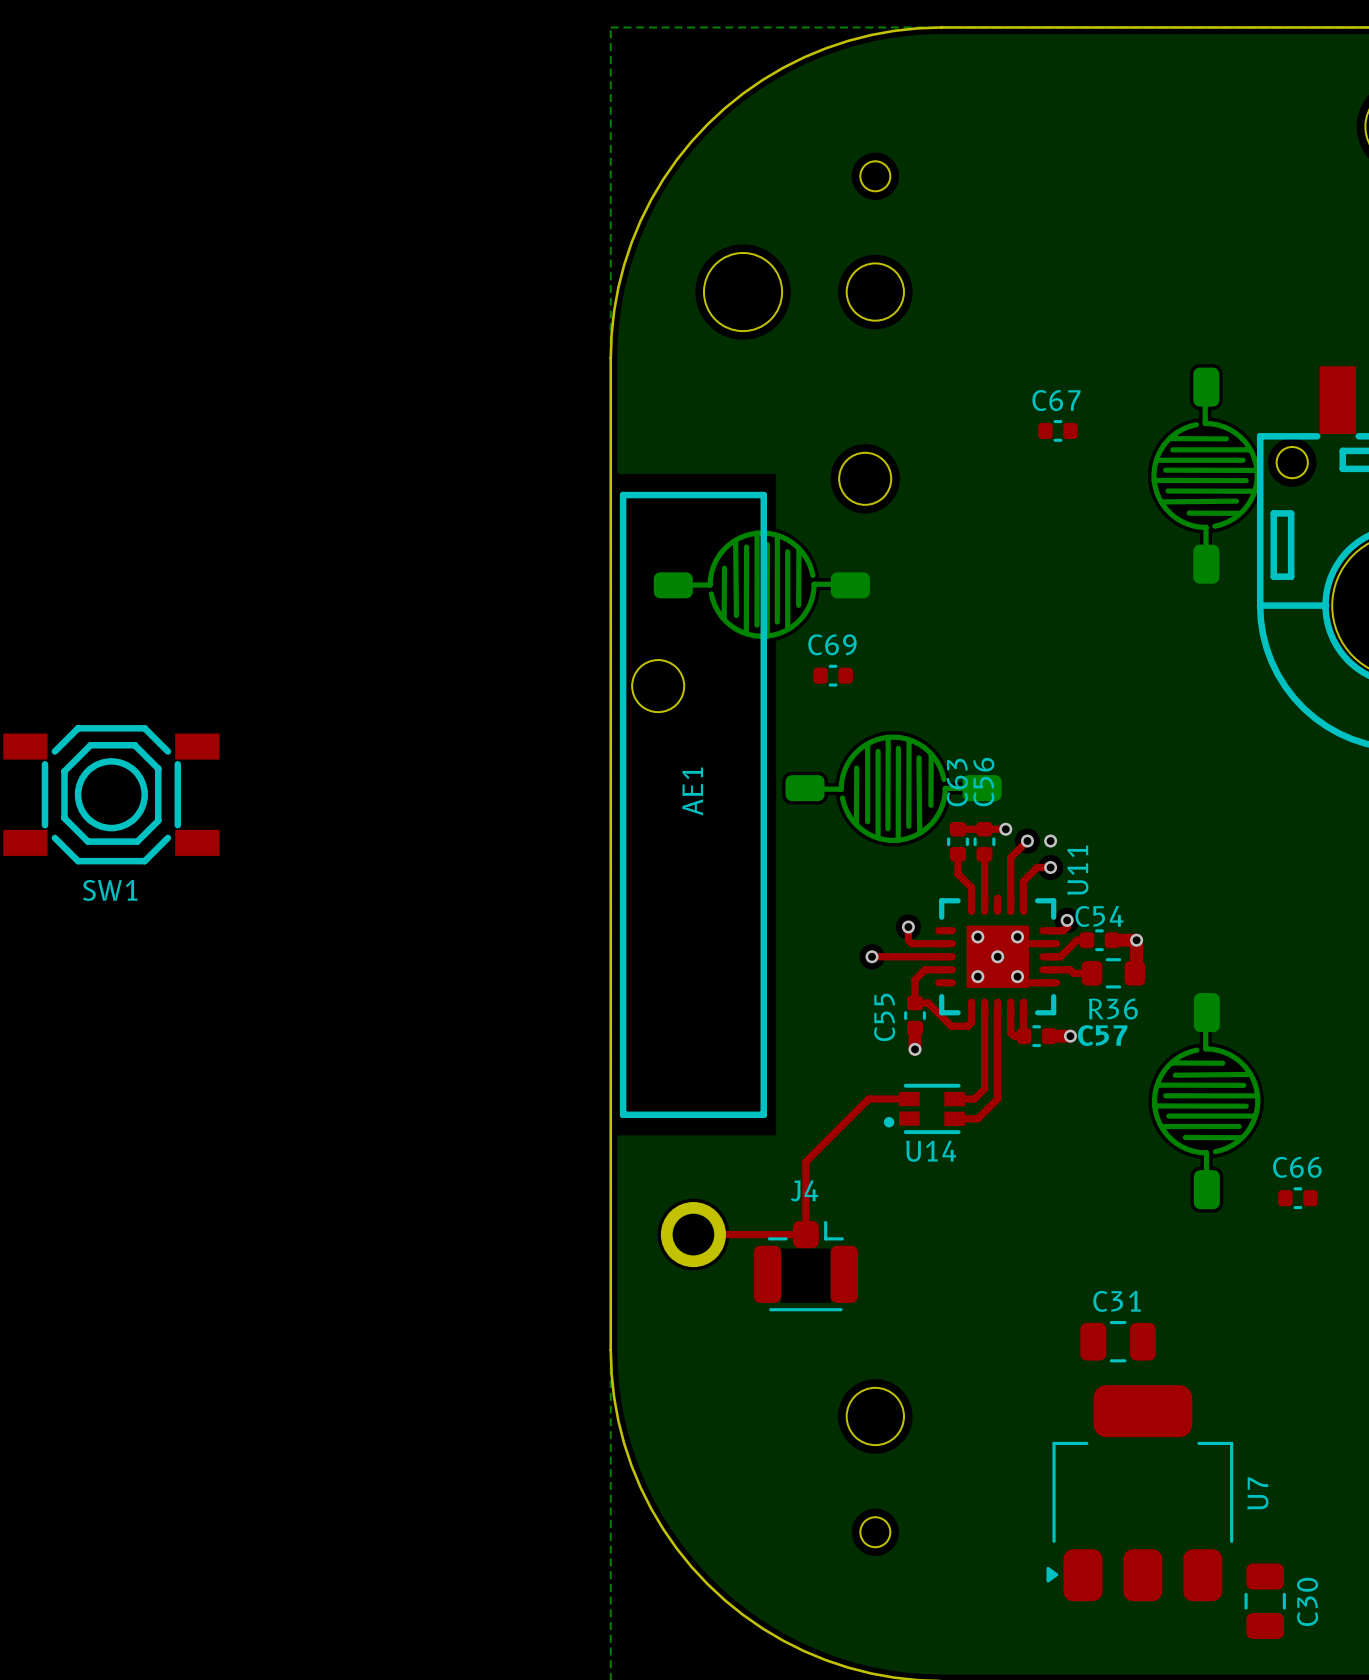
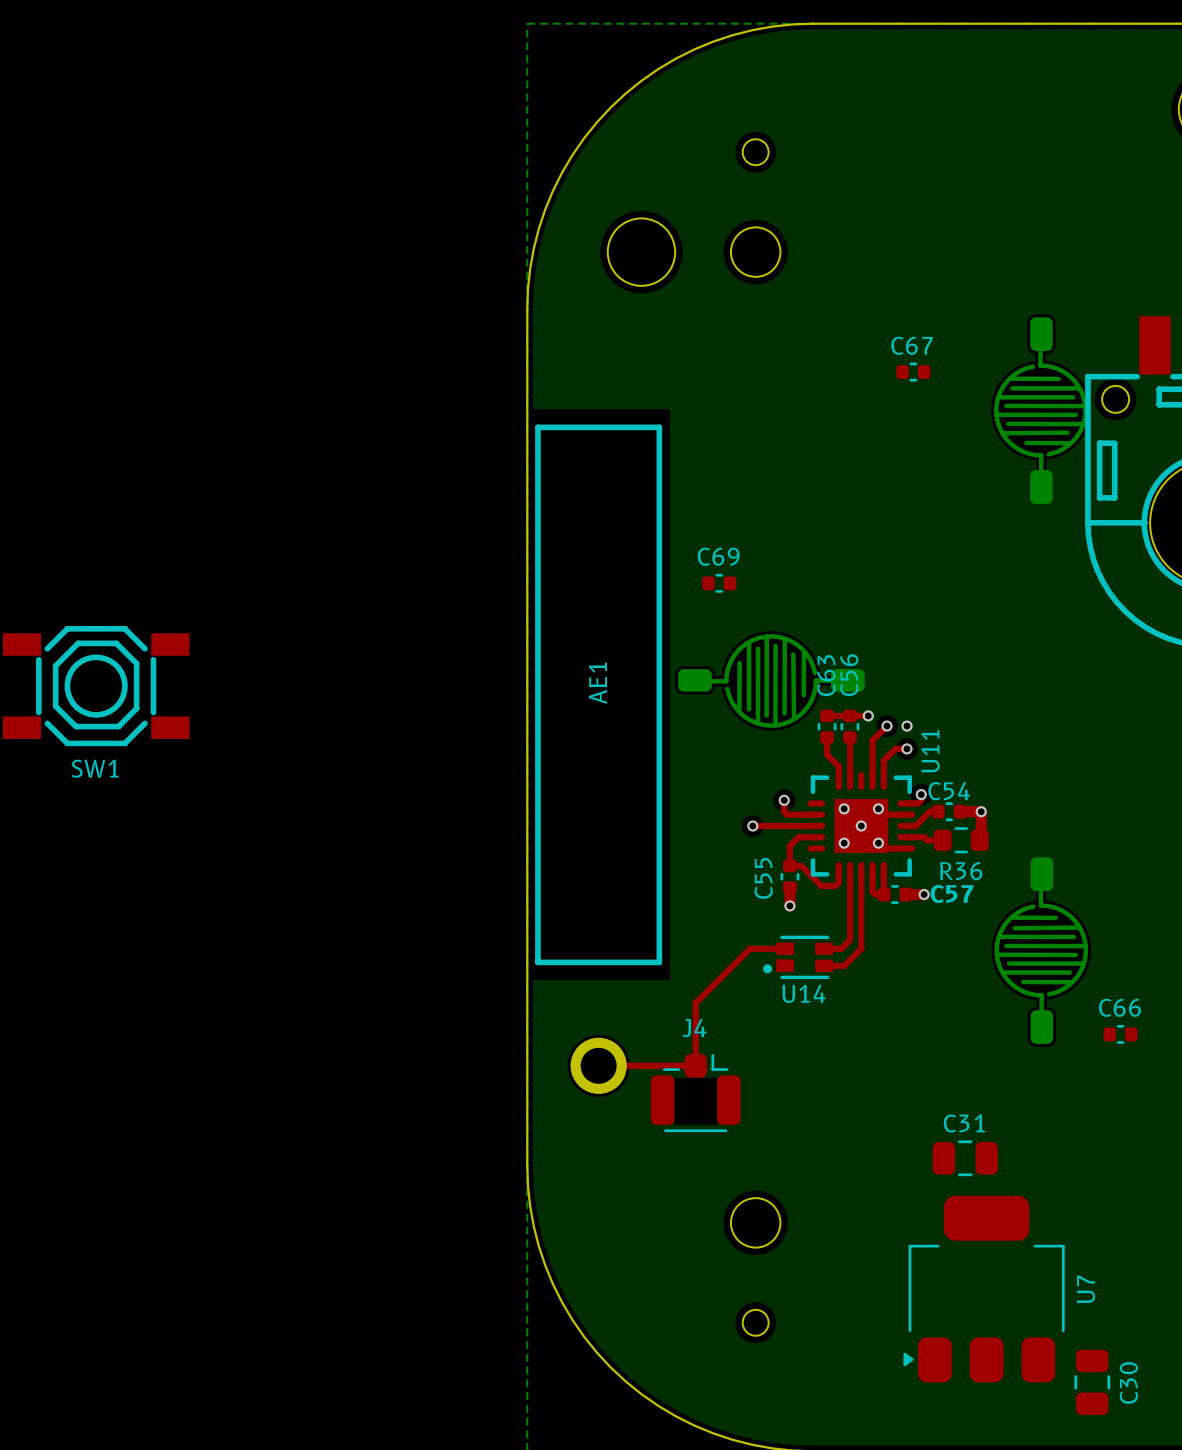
part: (761, 582) -> none

